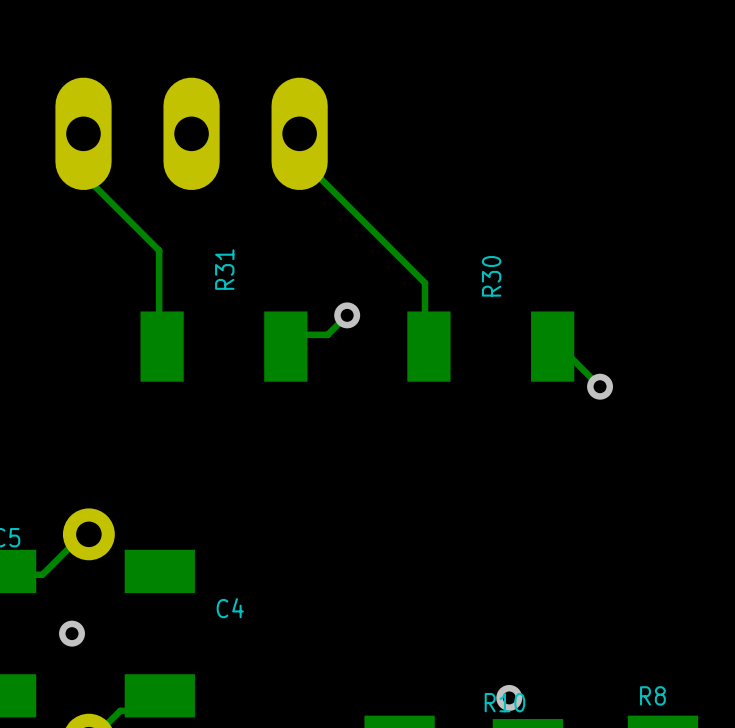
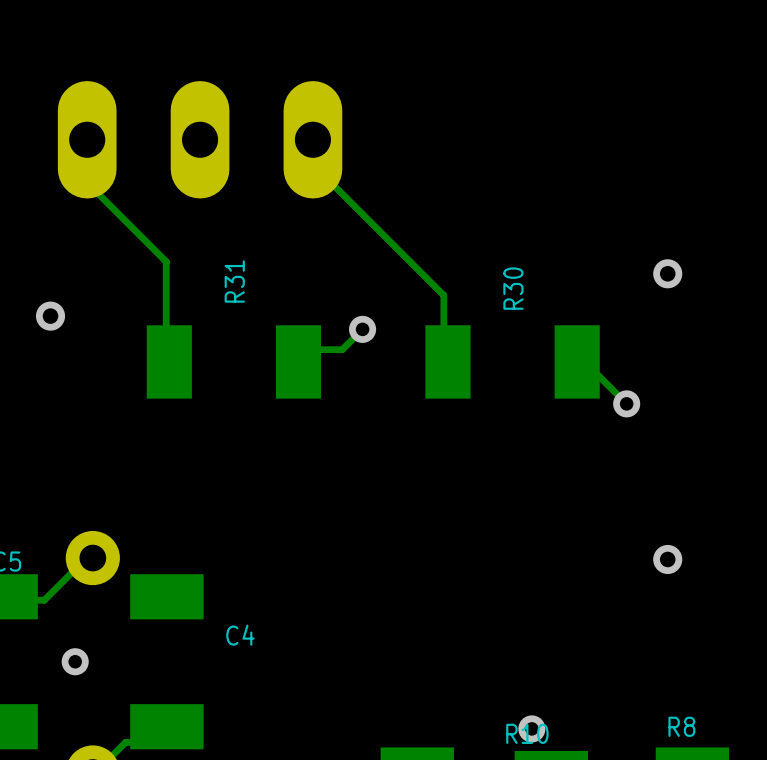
via: none -> (667, 273)
via: none -> (50, 316)
via: none -> (667, 559)

